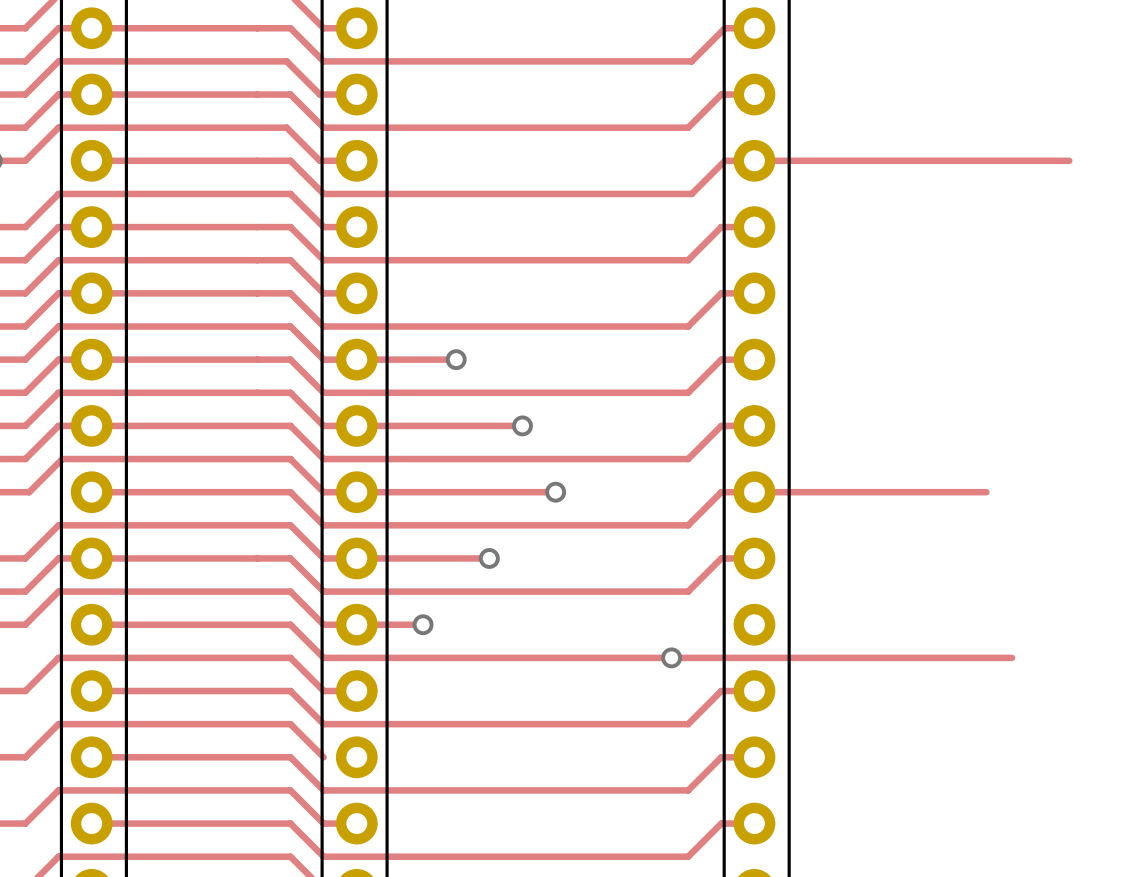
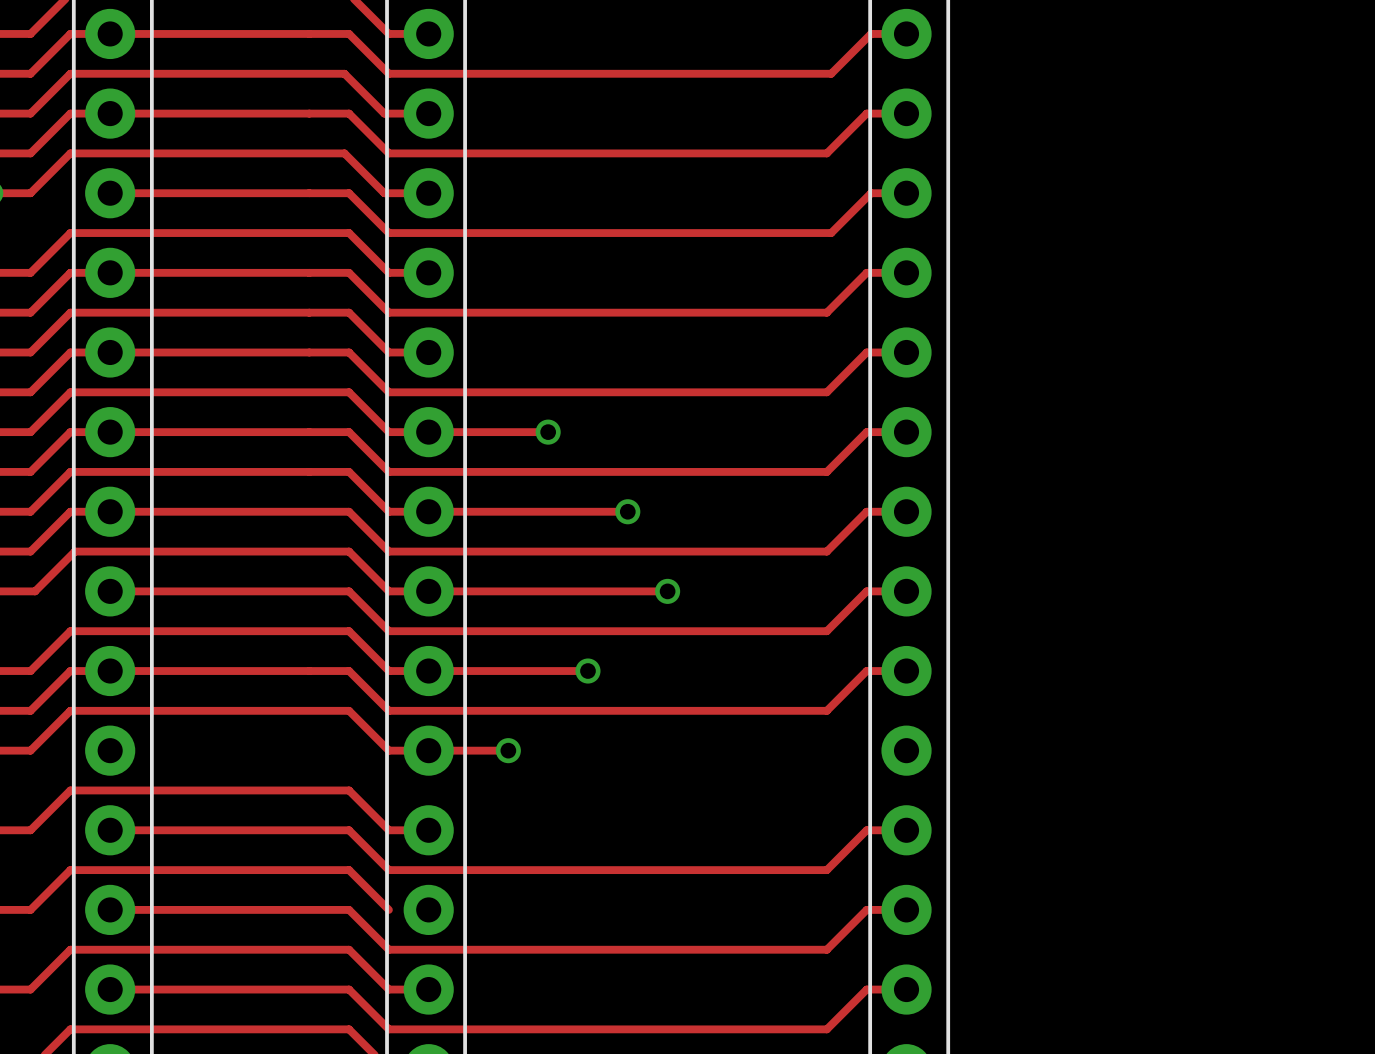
track: (754, 160) (1069, 160) -> none
track: (754, 492) (986, 492) -> none
track: (91, 624) (290, 624) (323, 657) (1011, 657) -> none
via: (671, 657) -> none

